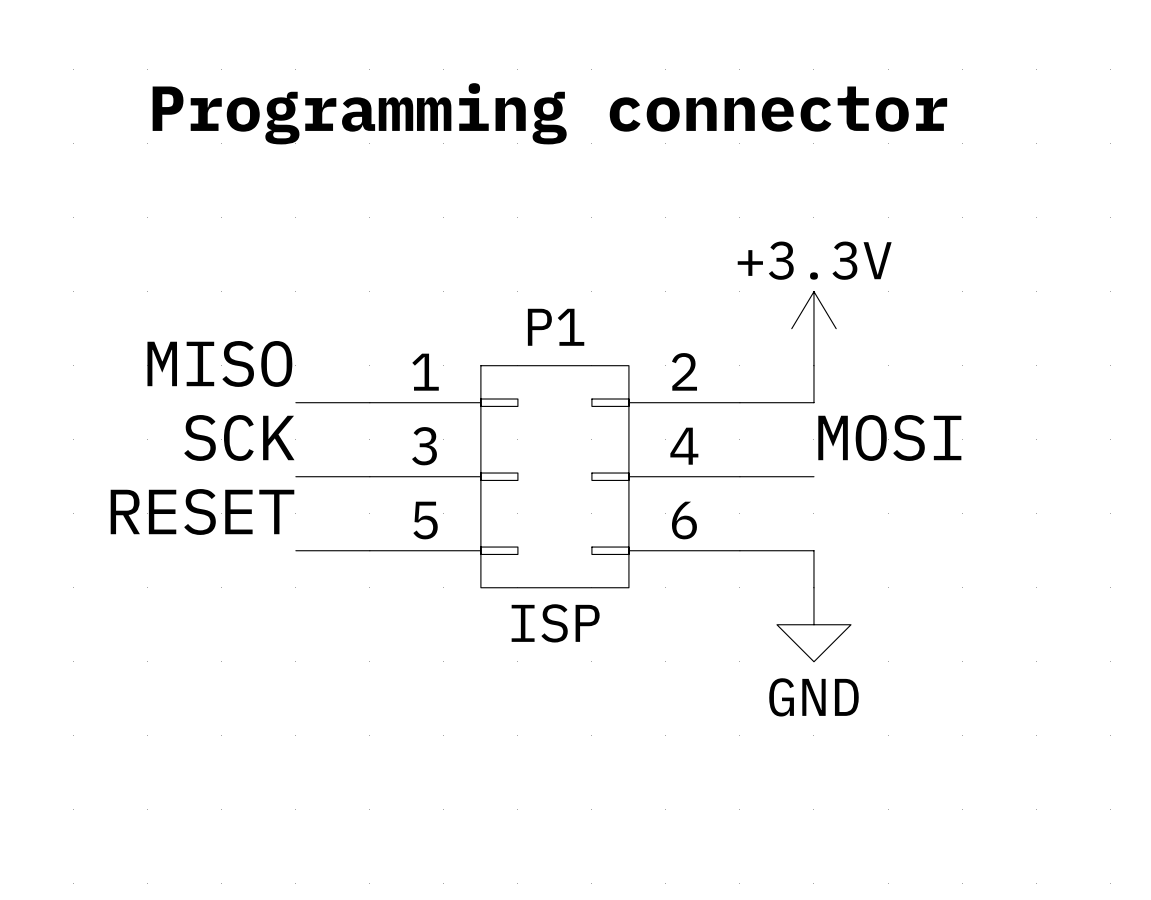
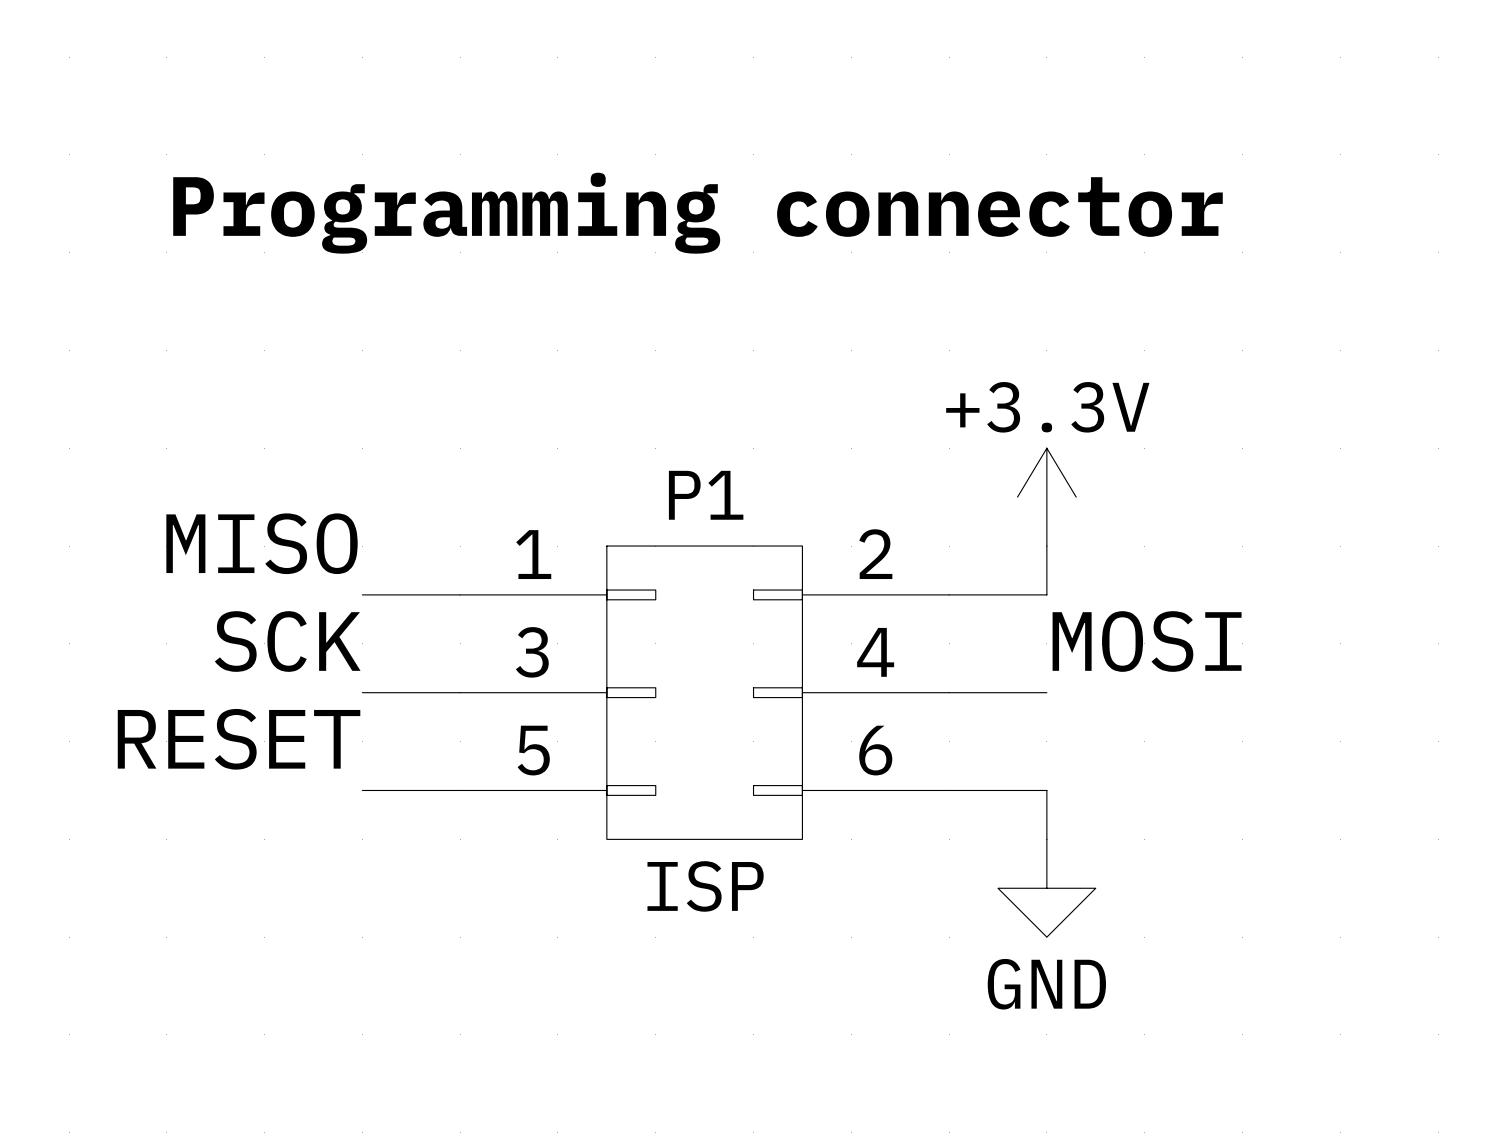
text position: Programming connector (549, 113) -> Programming connector (697, 213)
power symbol position: +3.3V (813, 328) -> +3.3V (1046, 497)
label: MISO (219, 363) -> none
wire: (813, 365) (813, 402) (739, 402) -> none
wire: (295, 402) (369, 402) -> (362, 790) (460, 790)
label: SCK (239, 437) -> MISO (262, 543)
label position: MOSI (889, 437) -> MOSI (1147, 641)
P1 position: (554, 476) -> (704, 692)
label: RESET (202, 511) -> SCK (287, 641)
wire: (813, 550) (813, 587) -> (1046, 546) (1046, 594)
label: none -> RESET (239, 739)
wire: none -> (949, 790) (1046, 790) (1046, 839)
power symbol position: GND (813, 624) -> GND (1046, 888)

